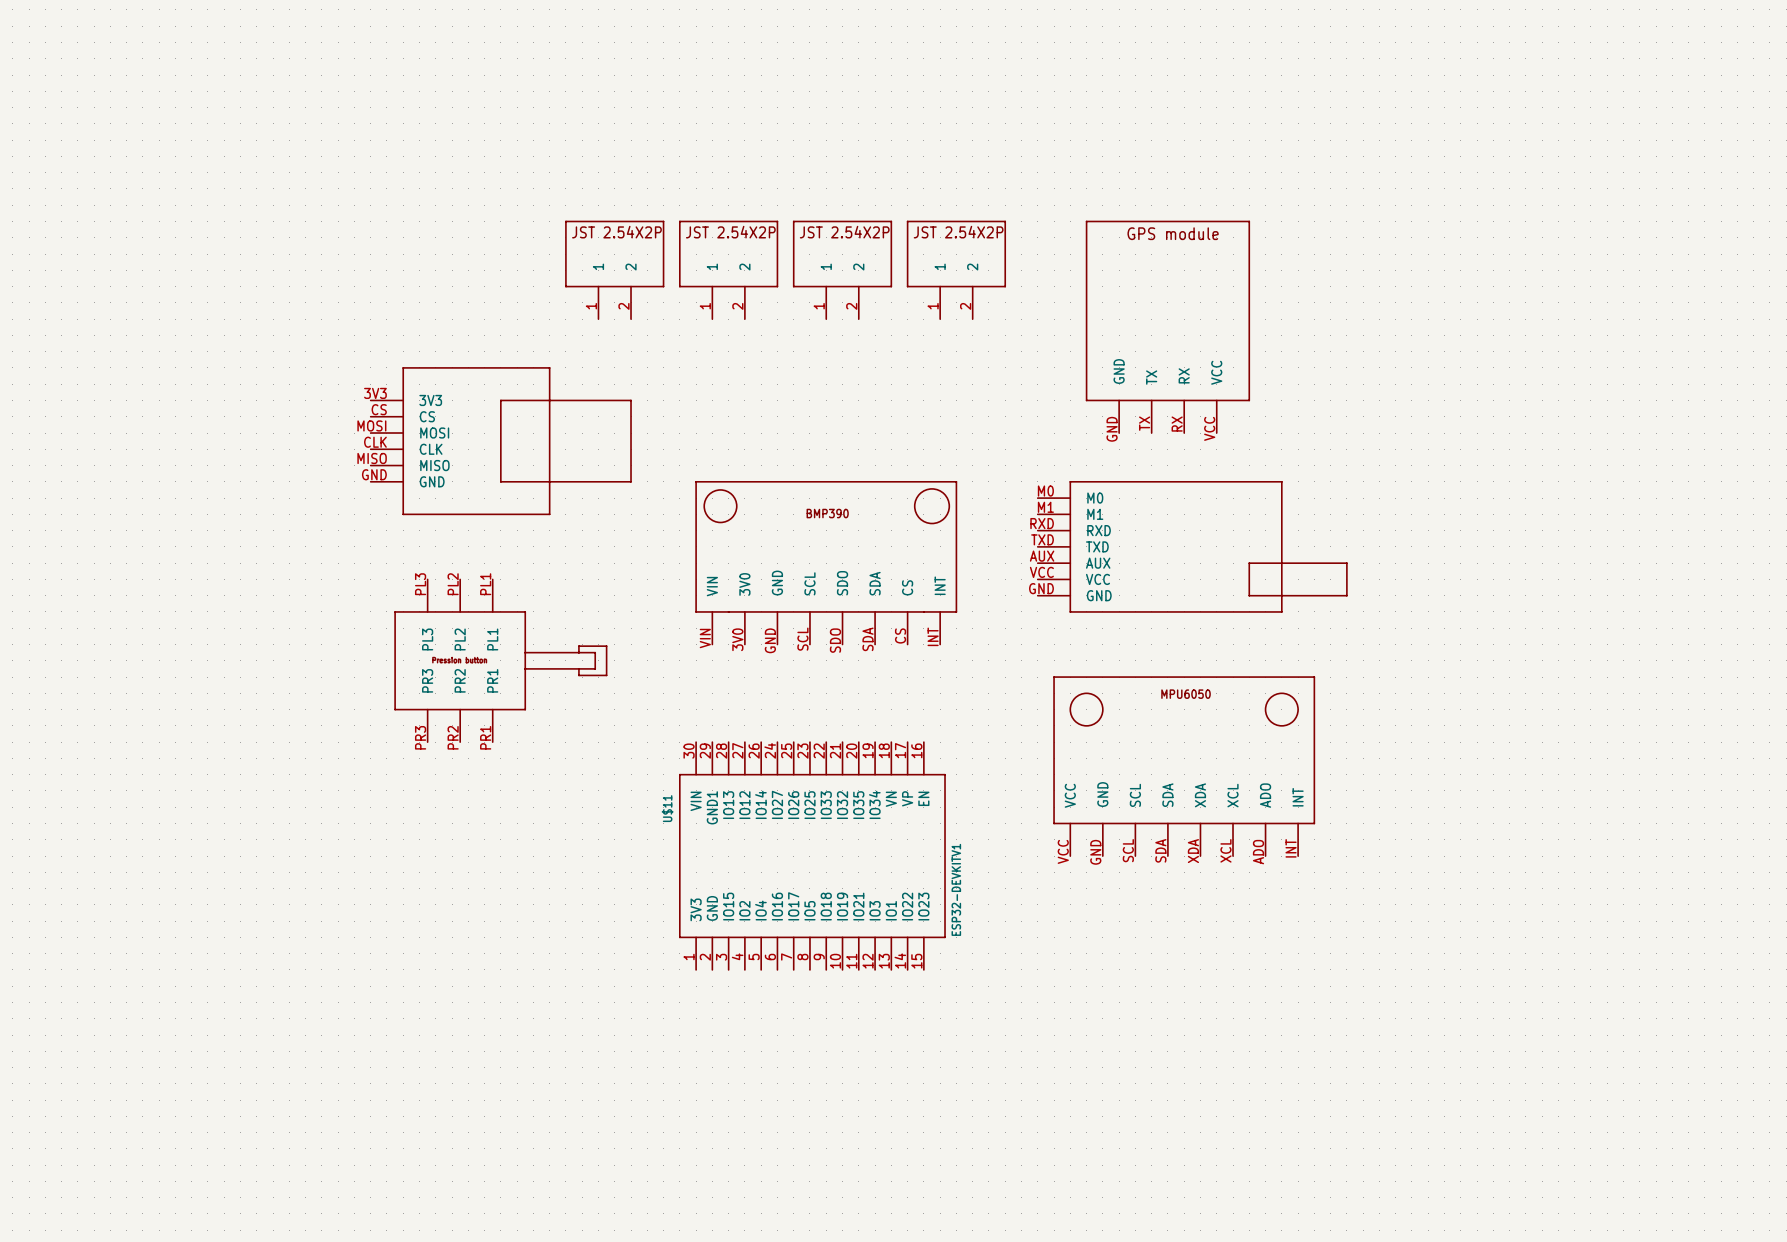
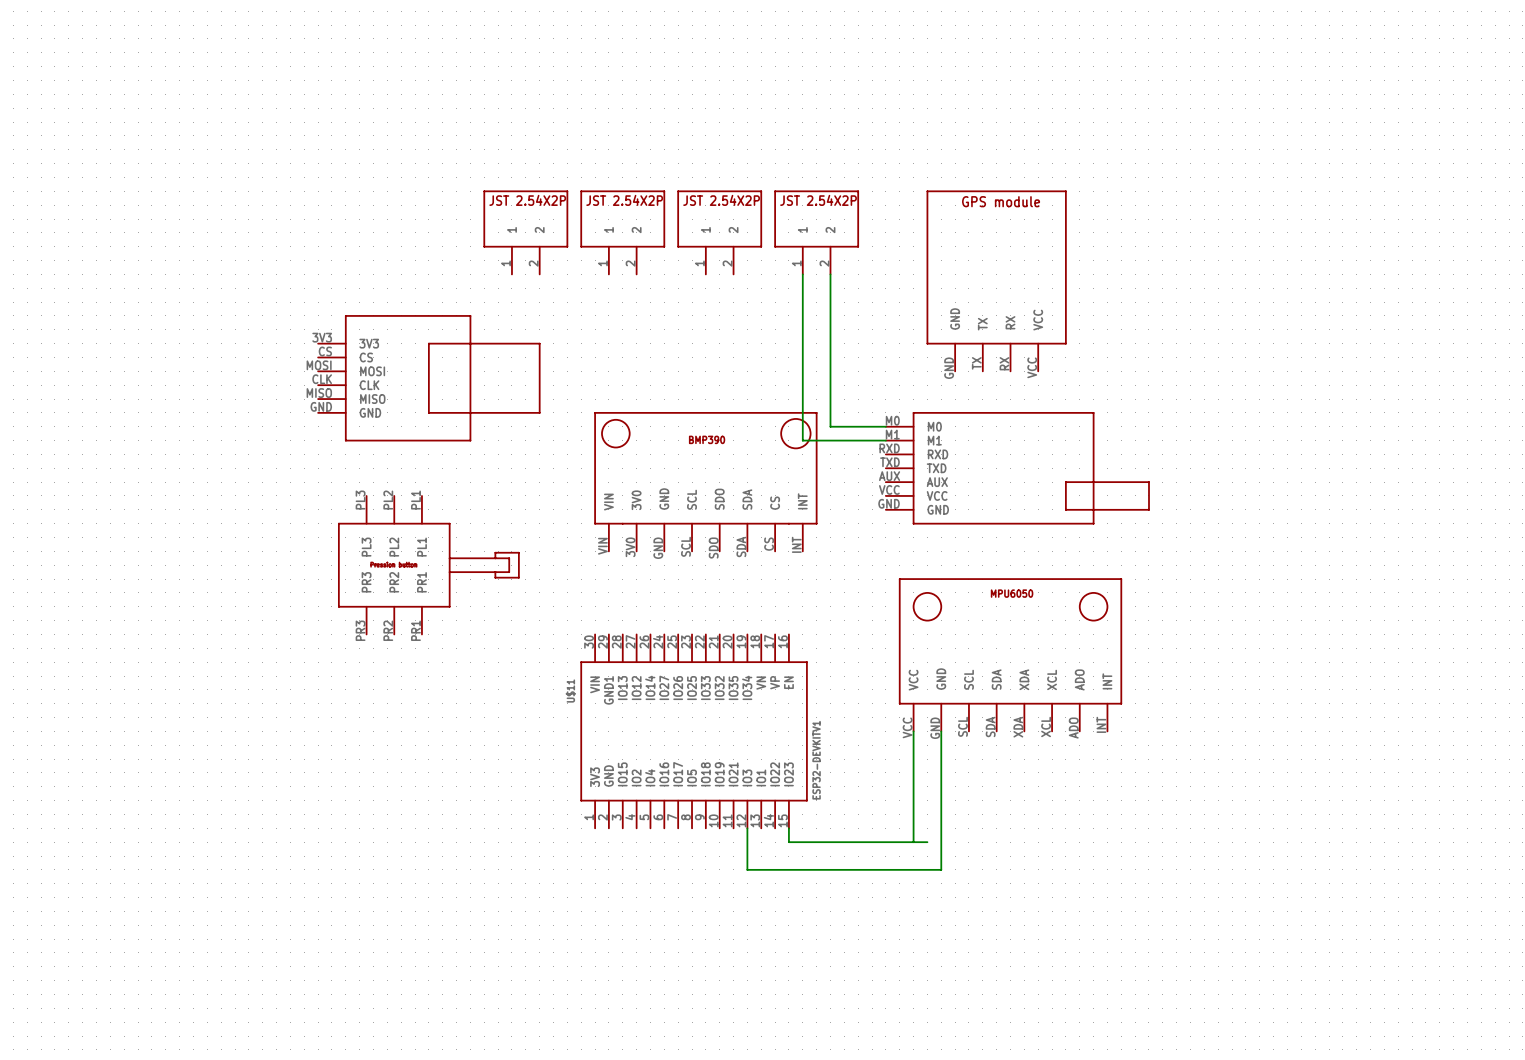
wire: none -> (802, 274) (802, 440) (885, 440)
wire: none -> (830, 274) (830, 426) (885, 426)
wire: none -> (913, 731) (913, 842)
wire: none -> (941, 731) (941, 869) (747, 869) (747, 828)
wire: none -> (788, 828) (788, 842) (927, 842)

